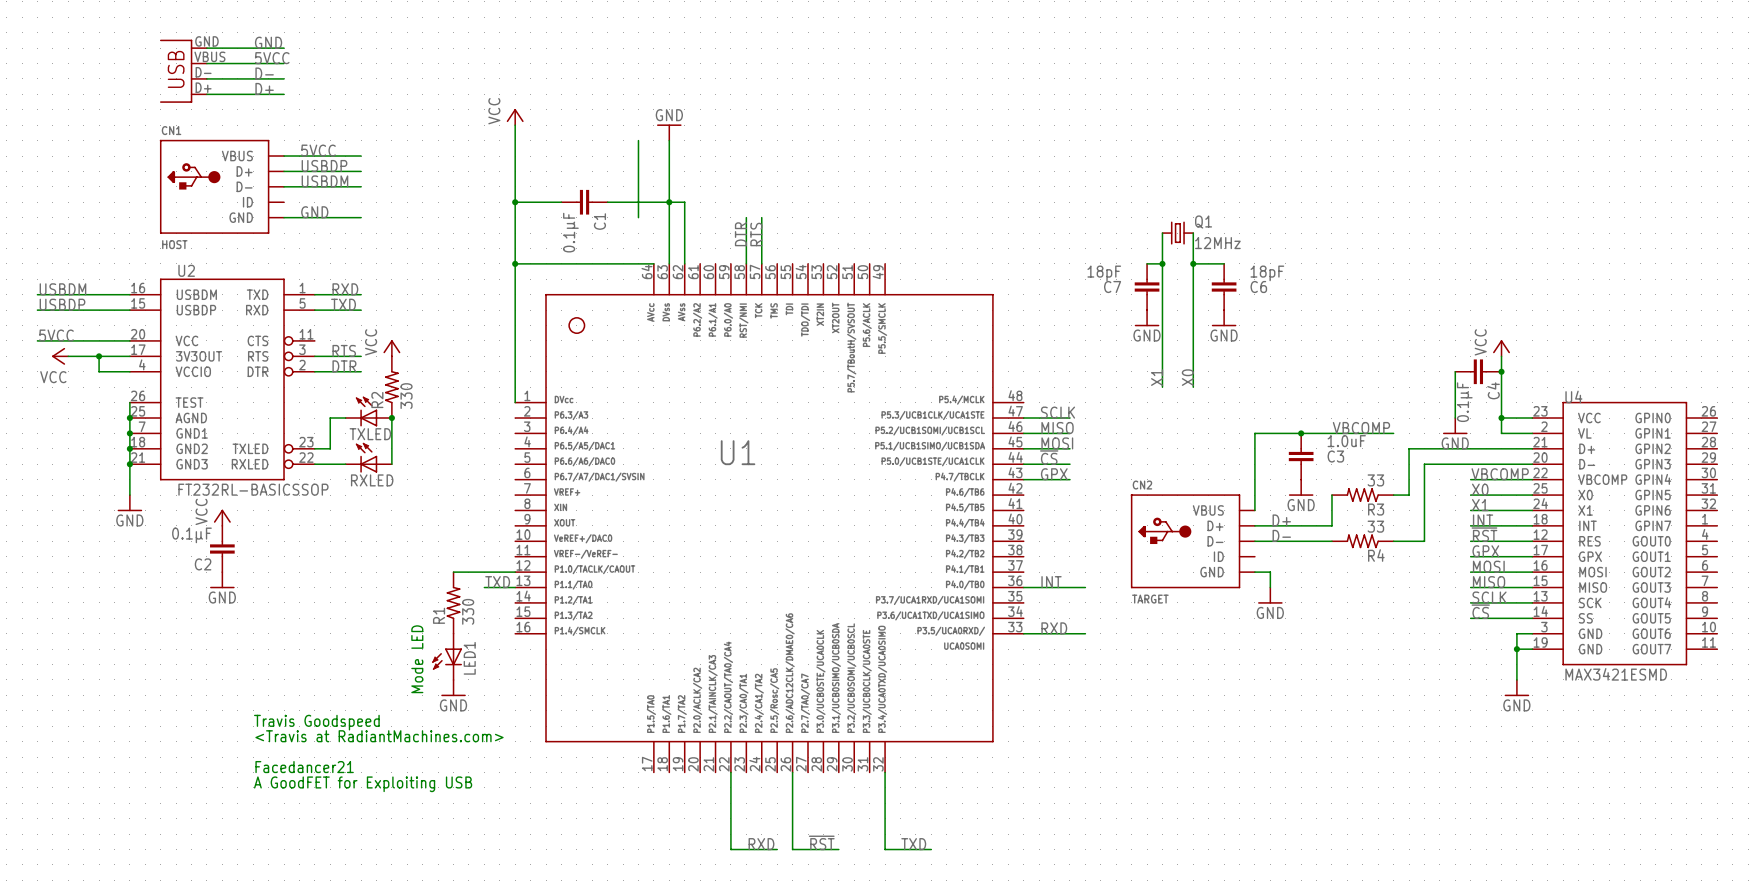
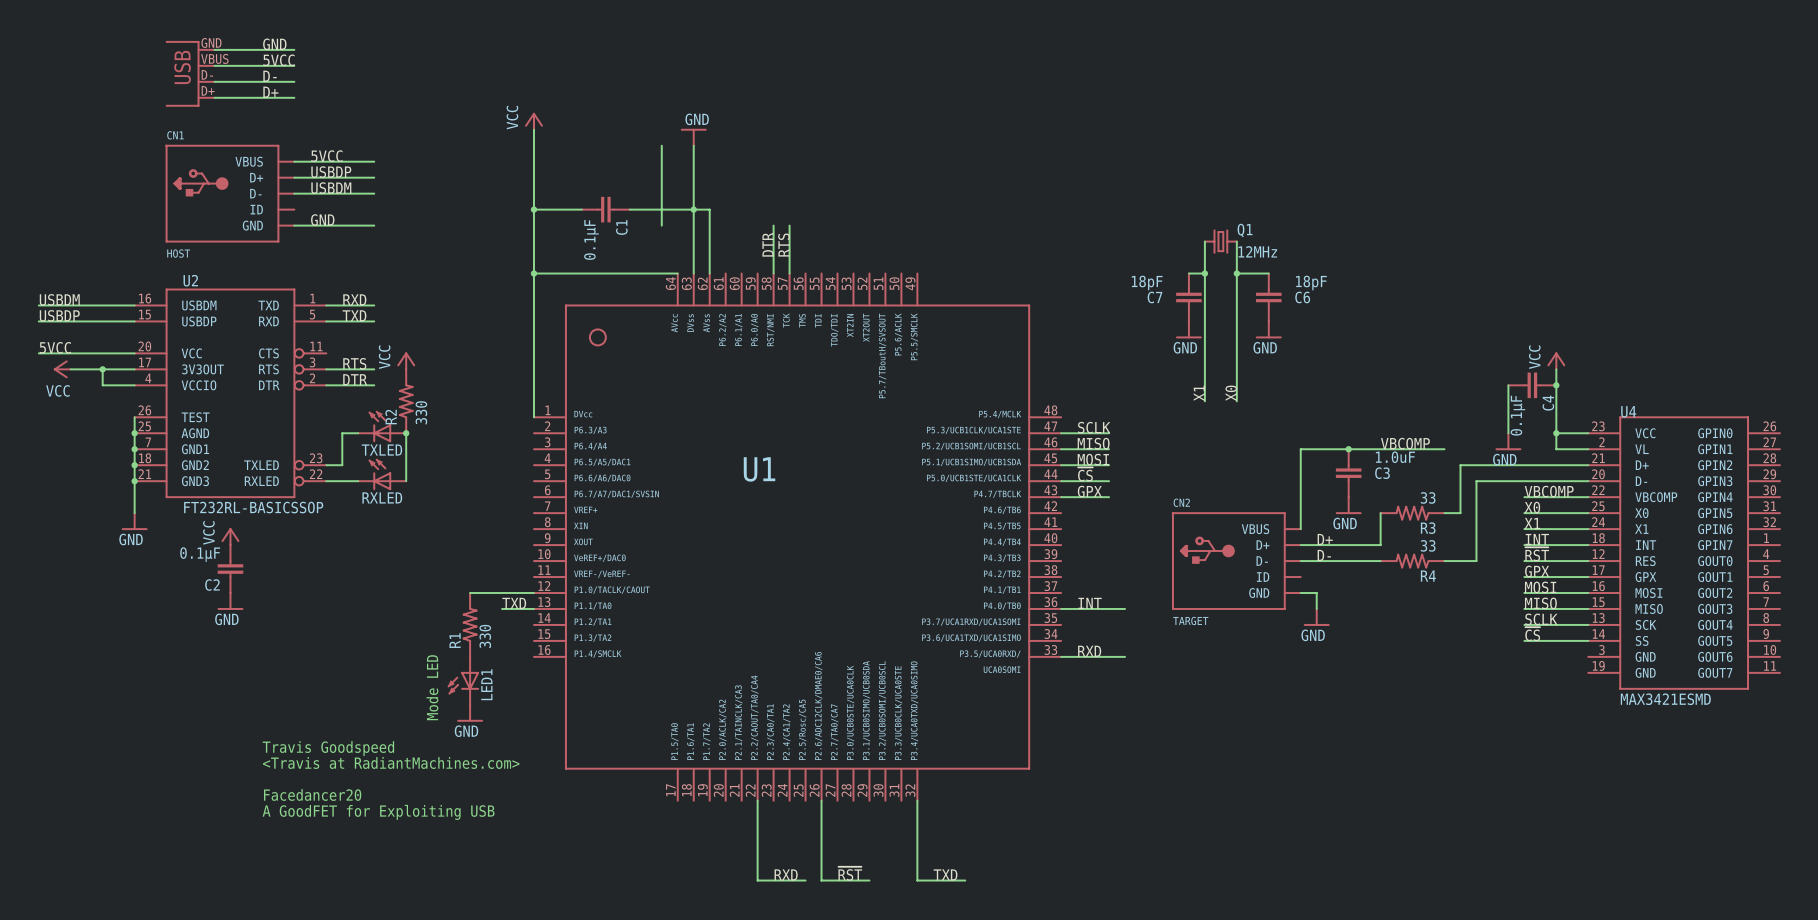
wire: (1532, 633) (1516, 633) (1516, 679) -> none
wire: (1516, 649) (1532, 649) -> none
junction: (1516, 649) -> none
power symbol: GND (1516, 688) -> none
text: Facedancer21 (304, 767) -> Facedancer20 (312, 794)

